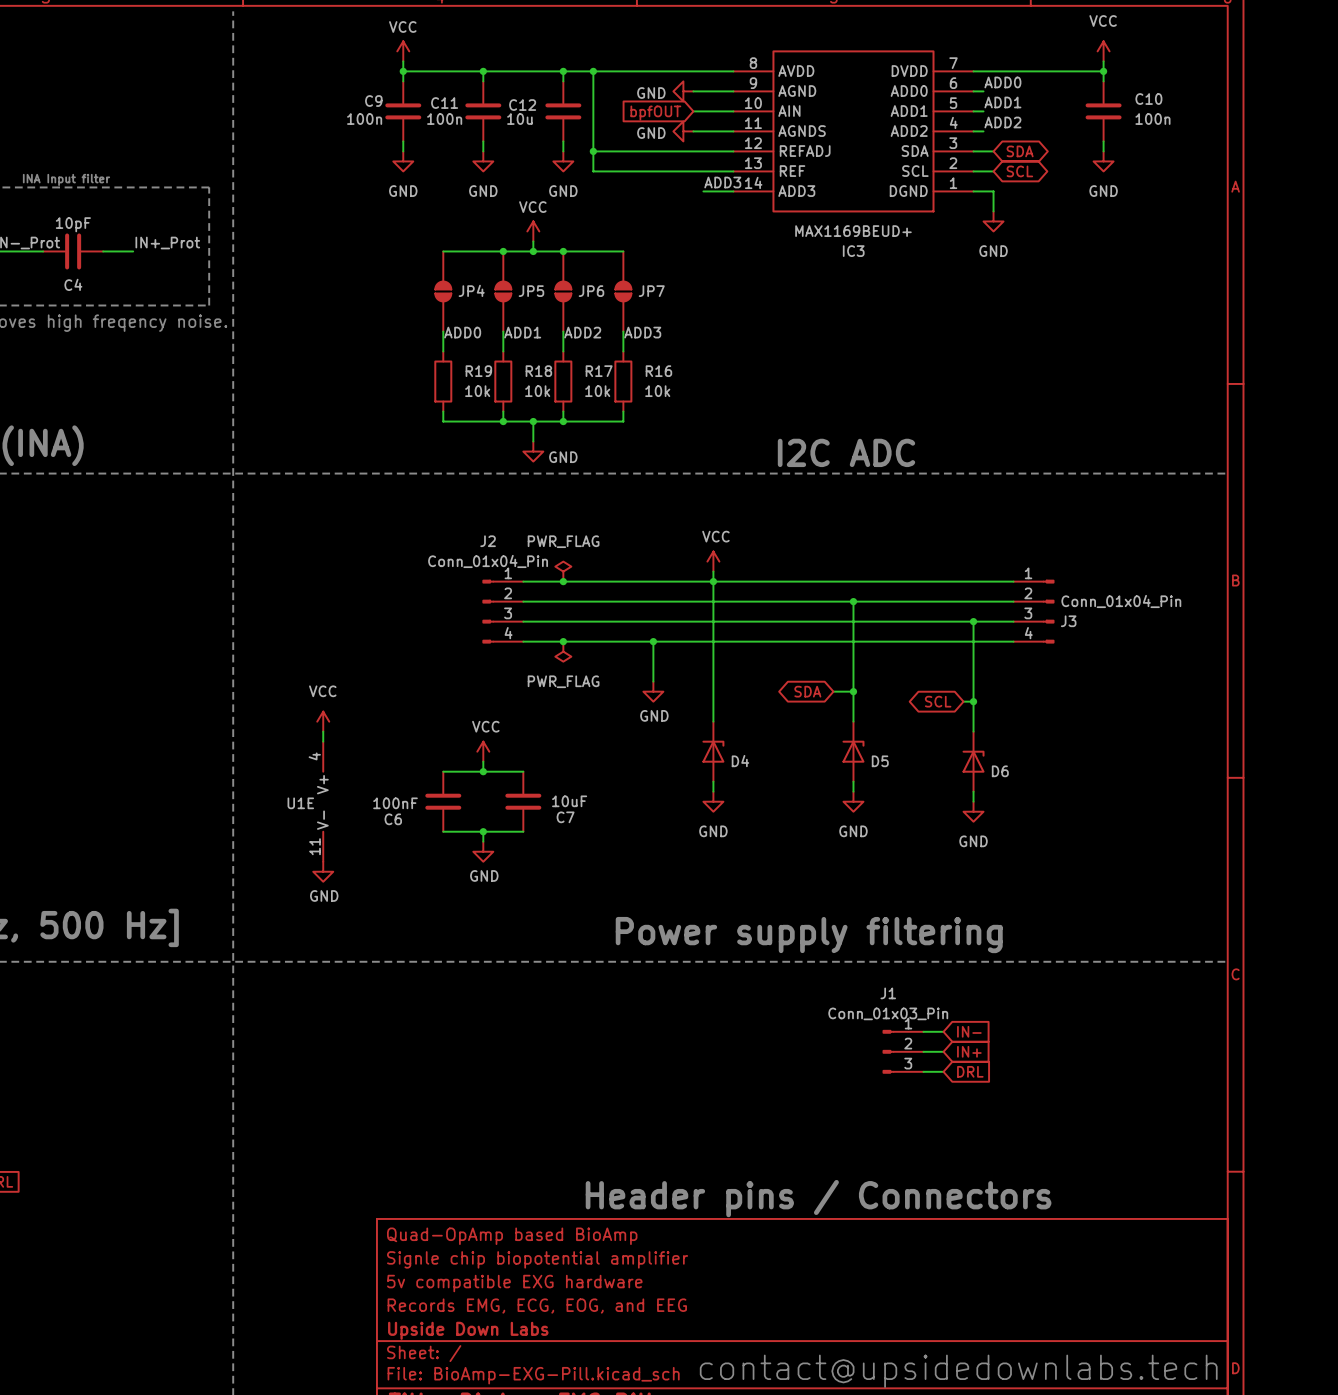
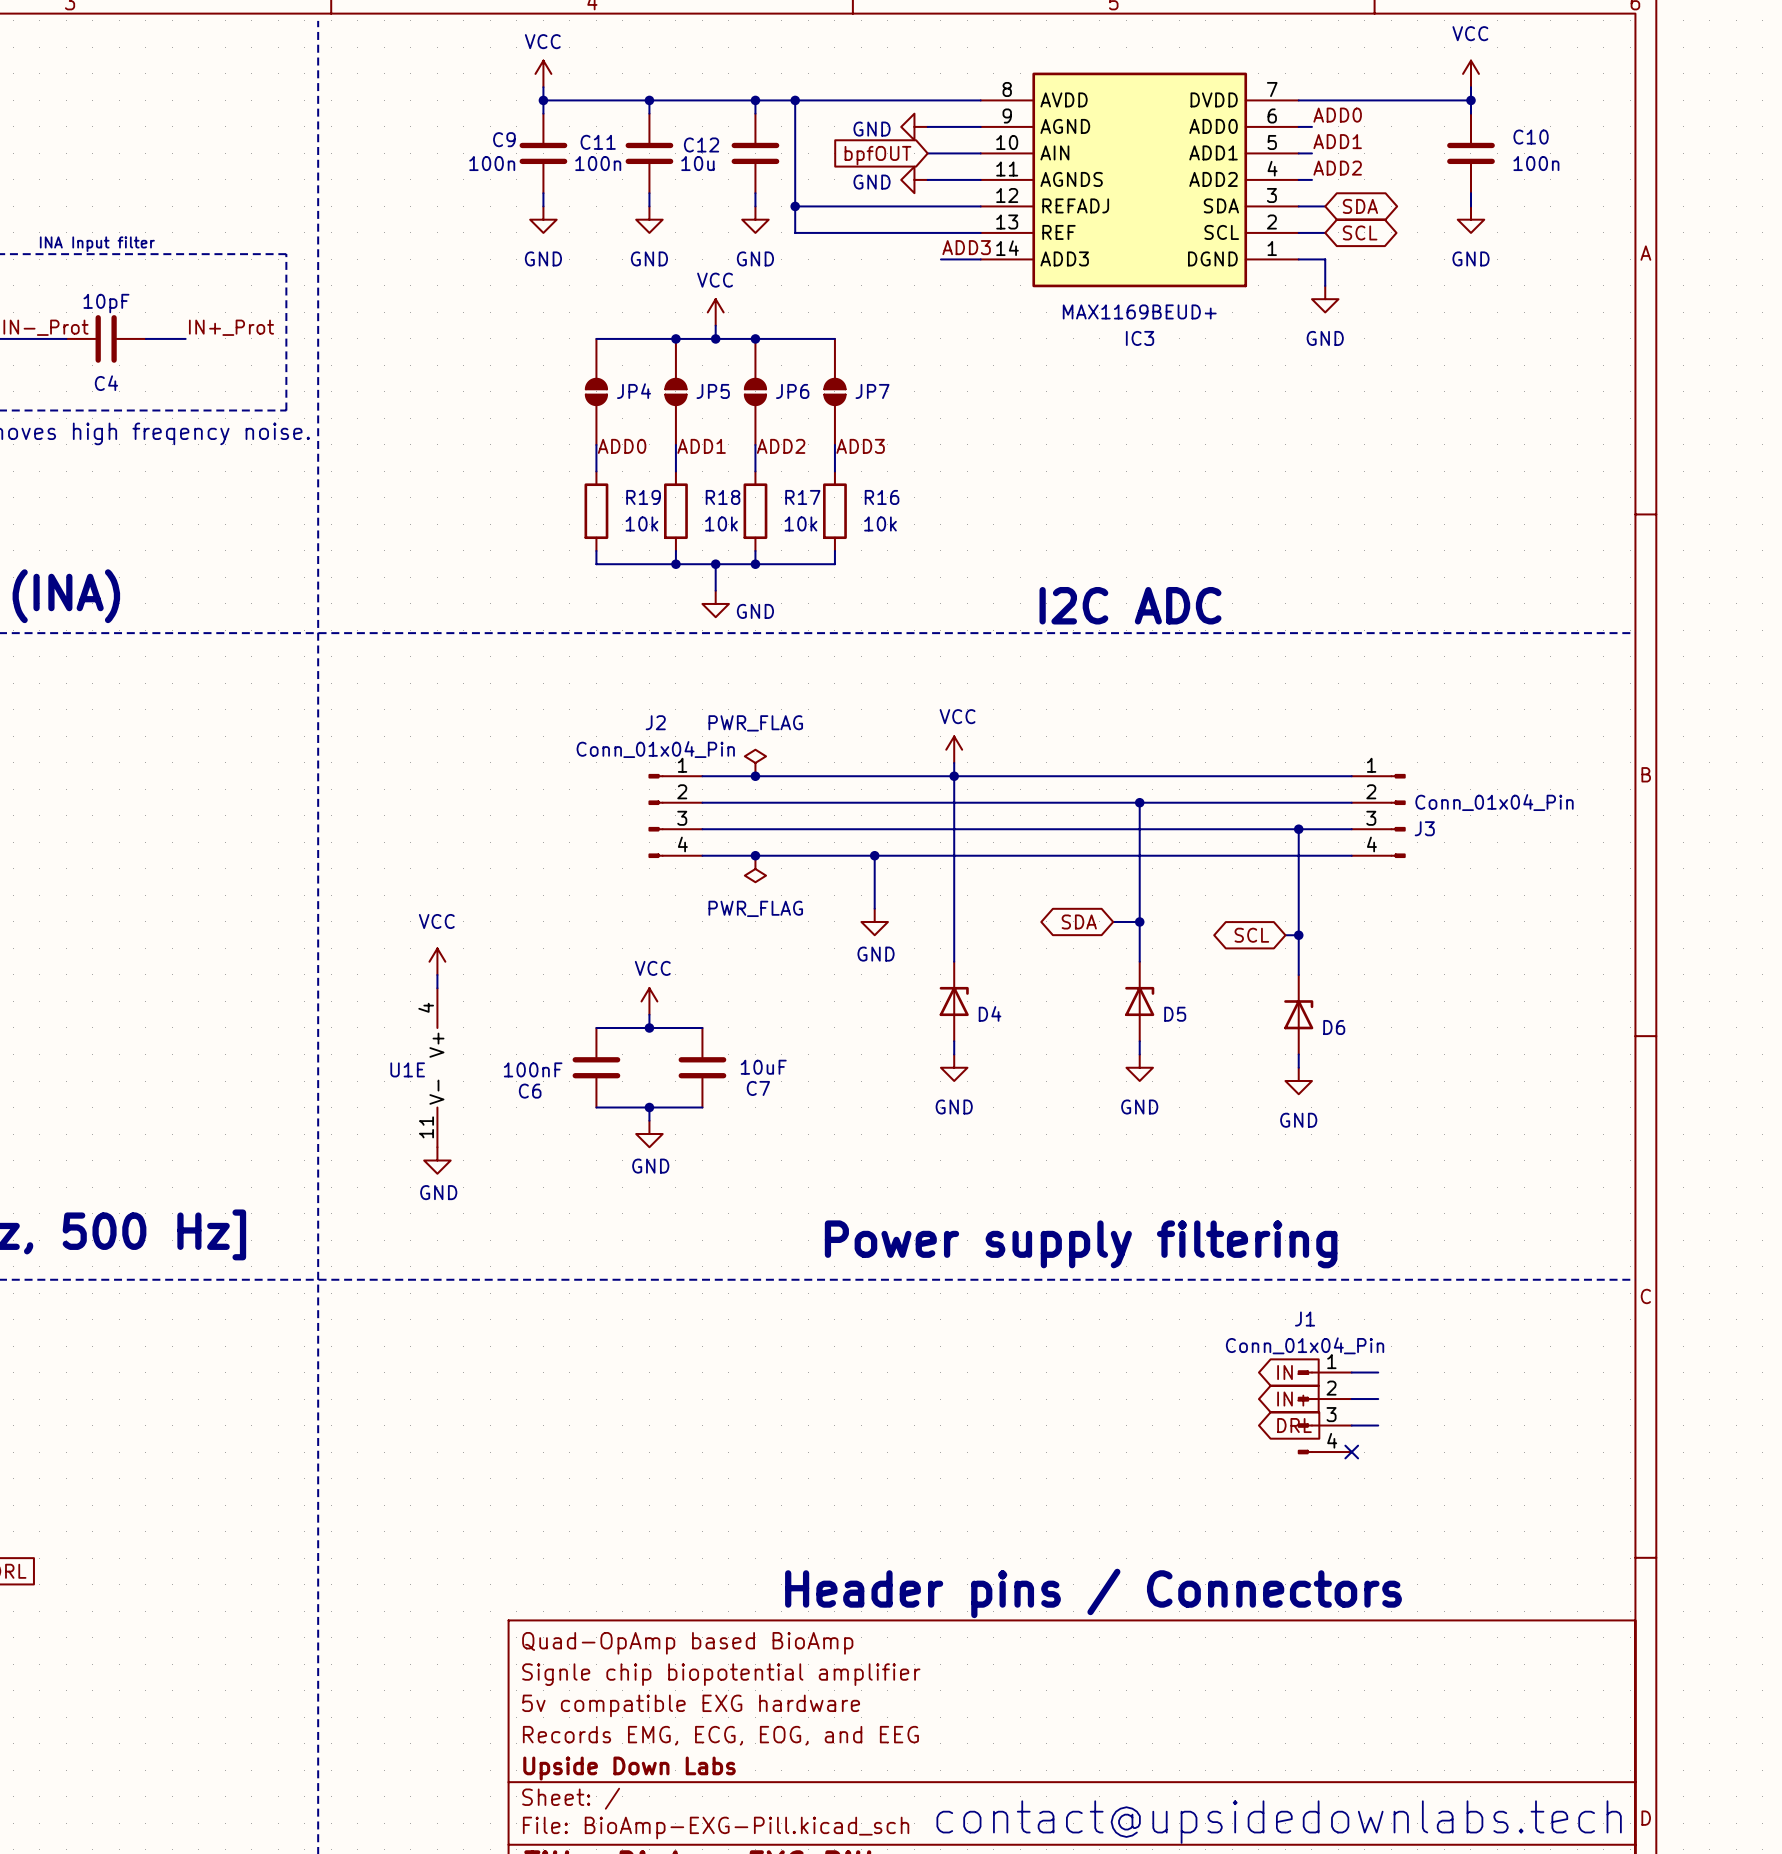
J1 value: Conn_01x03_Pin (888, 1013) -> Conn_01x04_Pin (1305, 1345)
J1 symbol: [882, 1030, 924, 1074] -> [1297, 1370, 1352, 1455]
wire: (923, 1031) (943, 1031) -> (1351, 1372) (1378, 1372)
wire: (923, 1051) (943, 1051) -> (1351, 1399) (1378, 1399)
wire: (923, 1071) (943, 1071) -> (1351, 1425) (1378, 1425)
no-connect mark: none -> (1351, 1452)

